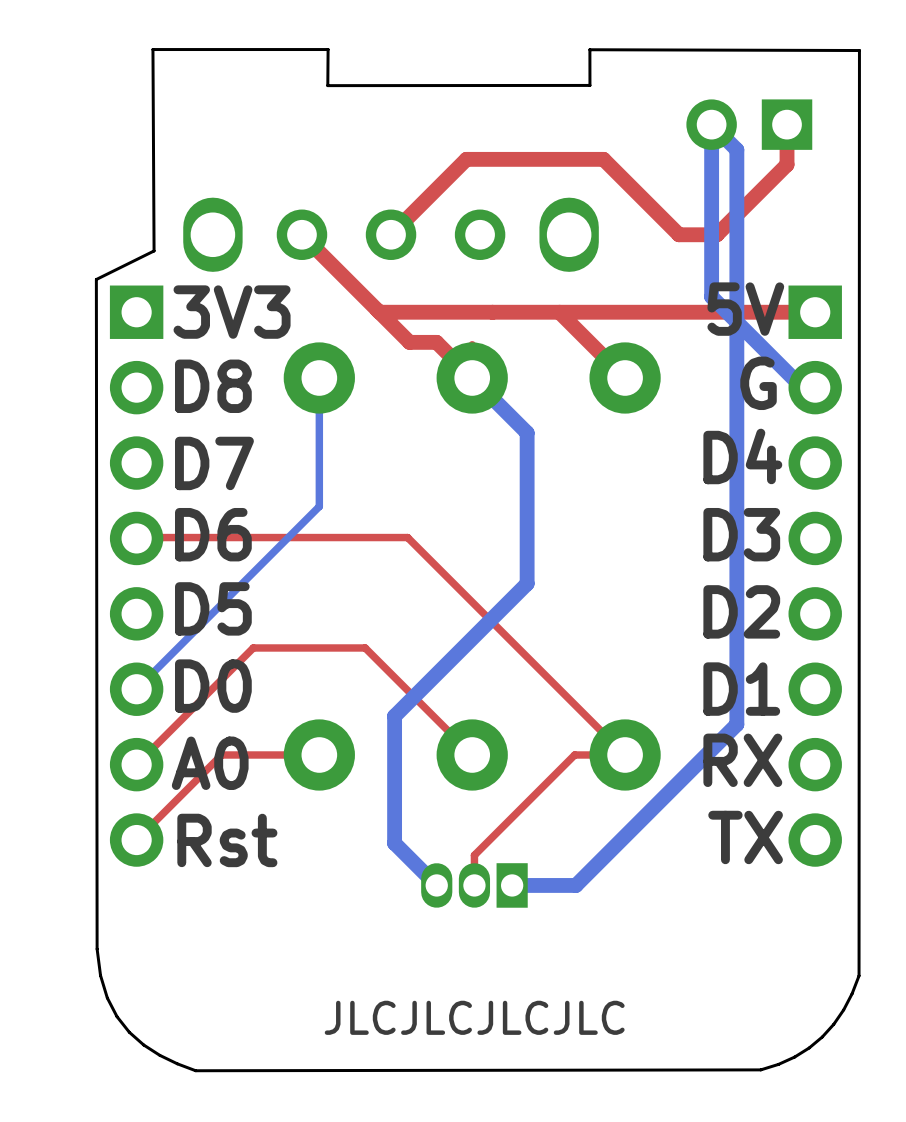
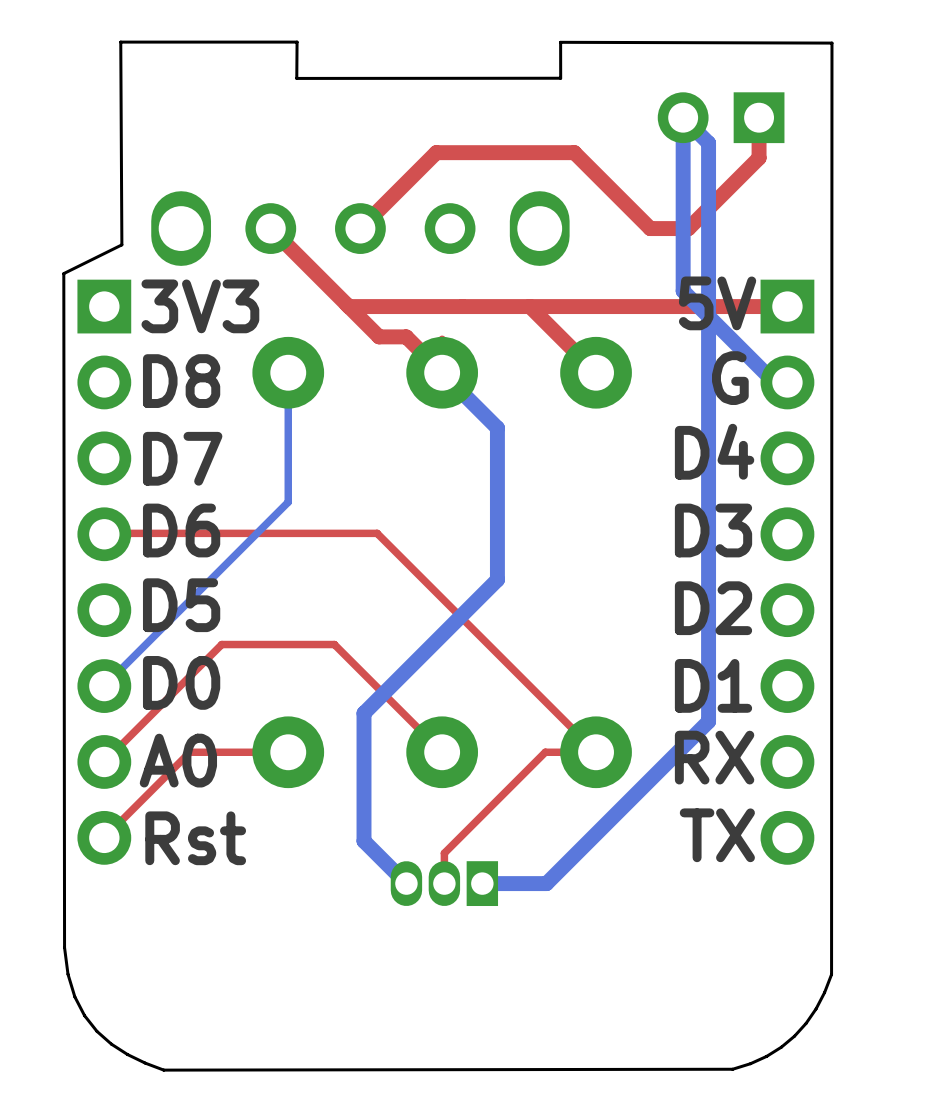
text: JLCJLCJLCJLC (474, 1017) -> none

